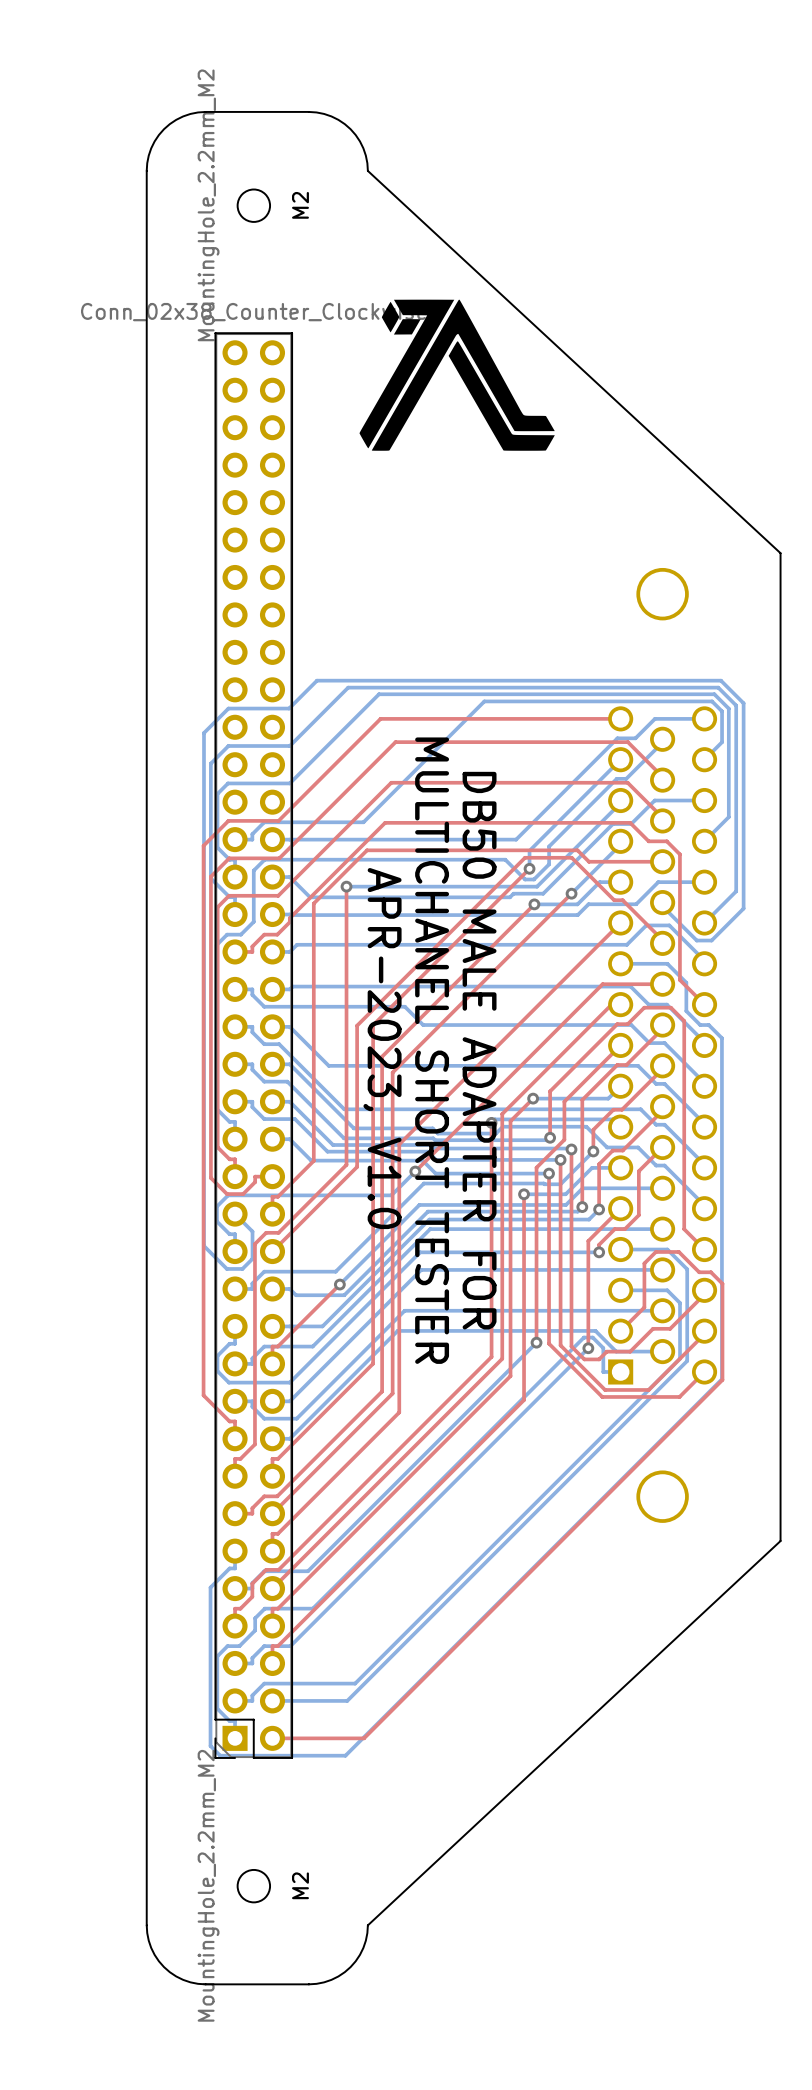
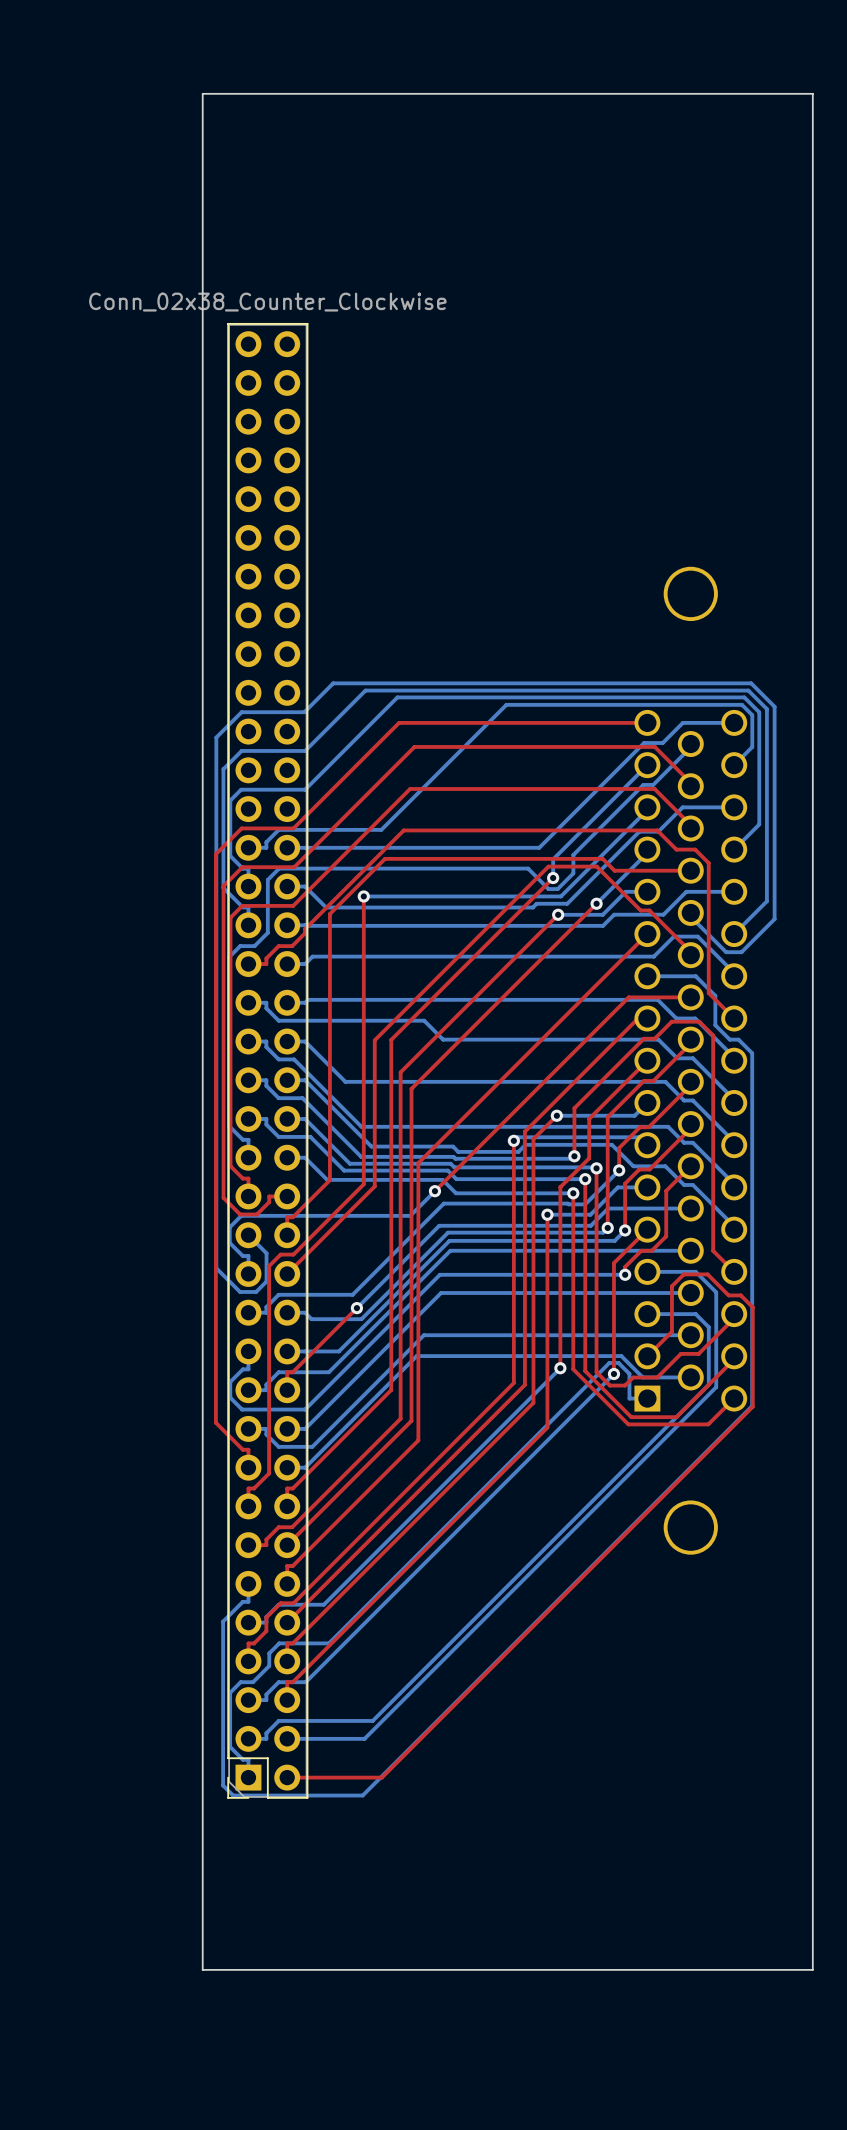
M2: MountingHole_2.2mm_M2 (253, 205) -> none
drawing: [359, 299, 555, 451] -> none
board edge: (780, 553) (367, 170) (365, 155) (359, 141) (350, 129) (338, 119) (324, 113) (308, 111) (198, 112) (183, 116) (169, 124) (154, 141) (148, 155) (146, 170) (146, 1925) (148, 1940) (158, 1961) (176, 1976) (190, 1982) (205, 1984) (316, 1983) (331, 1979) (344, 1972) (359, 1954) (365, 1940) (367, 1925) (780, 1541) -> (812, 551) (812, 93) (202, 93) (202, 1969) (812, 1969) (812, 1573)
text: APR-2023, V1.0 (382, 1048) -> none
text: MULTICHANEL SHORT TESTER (432, 1050) -> none
text: DB50 MALE ADAPTER FOR (479, 1050) -> none
M2: MountingHole_2.2mm_M2 (253, 1886) -> none

